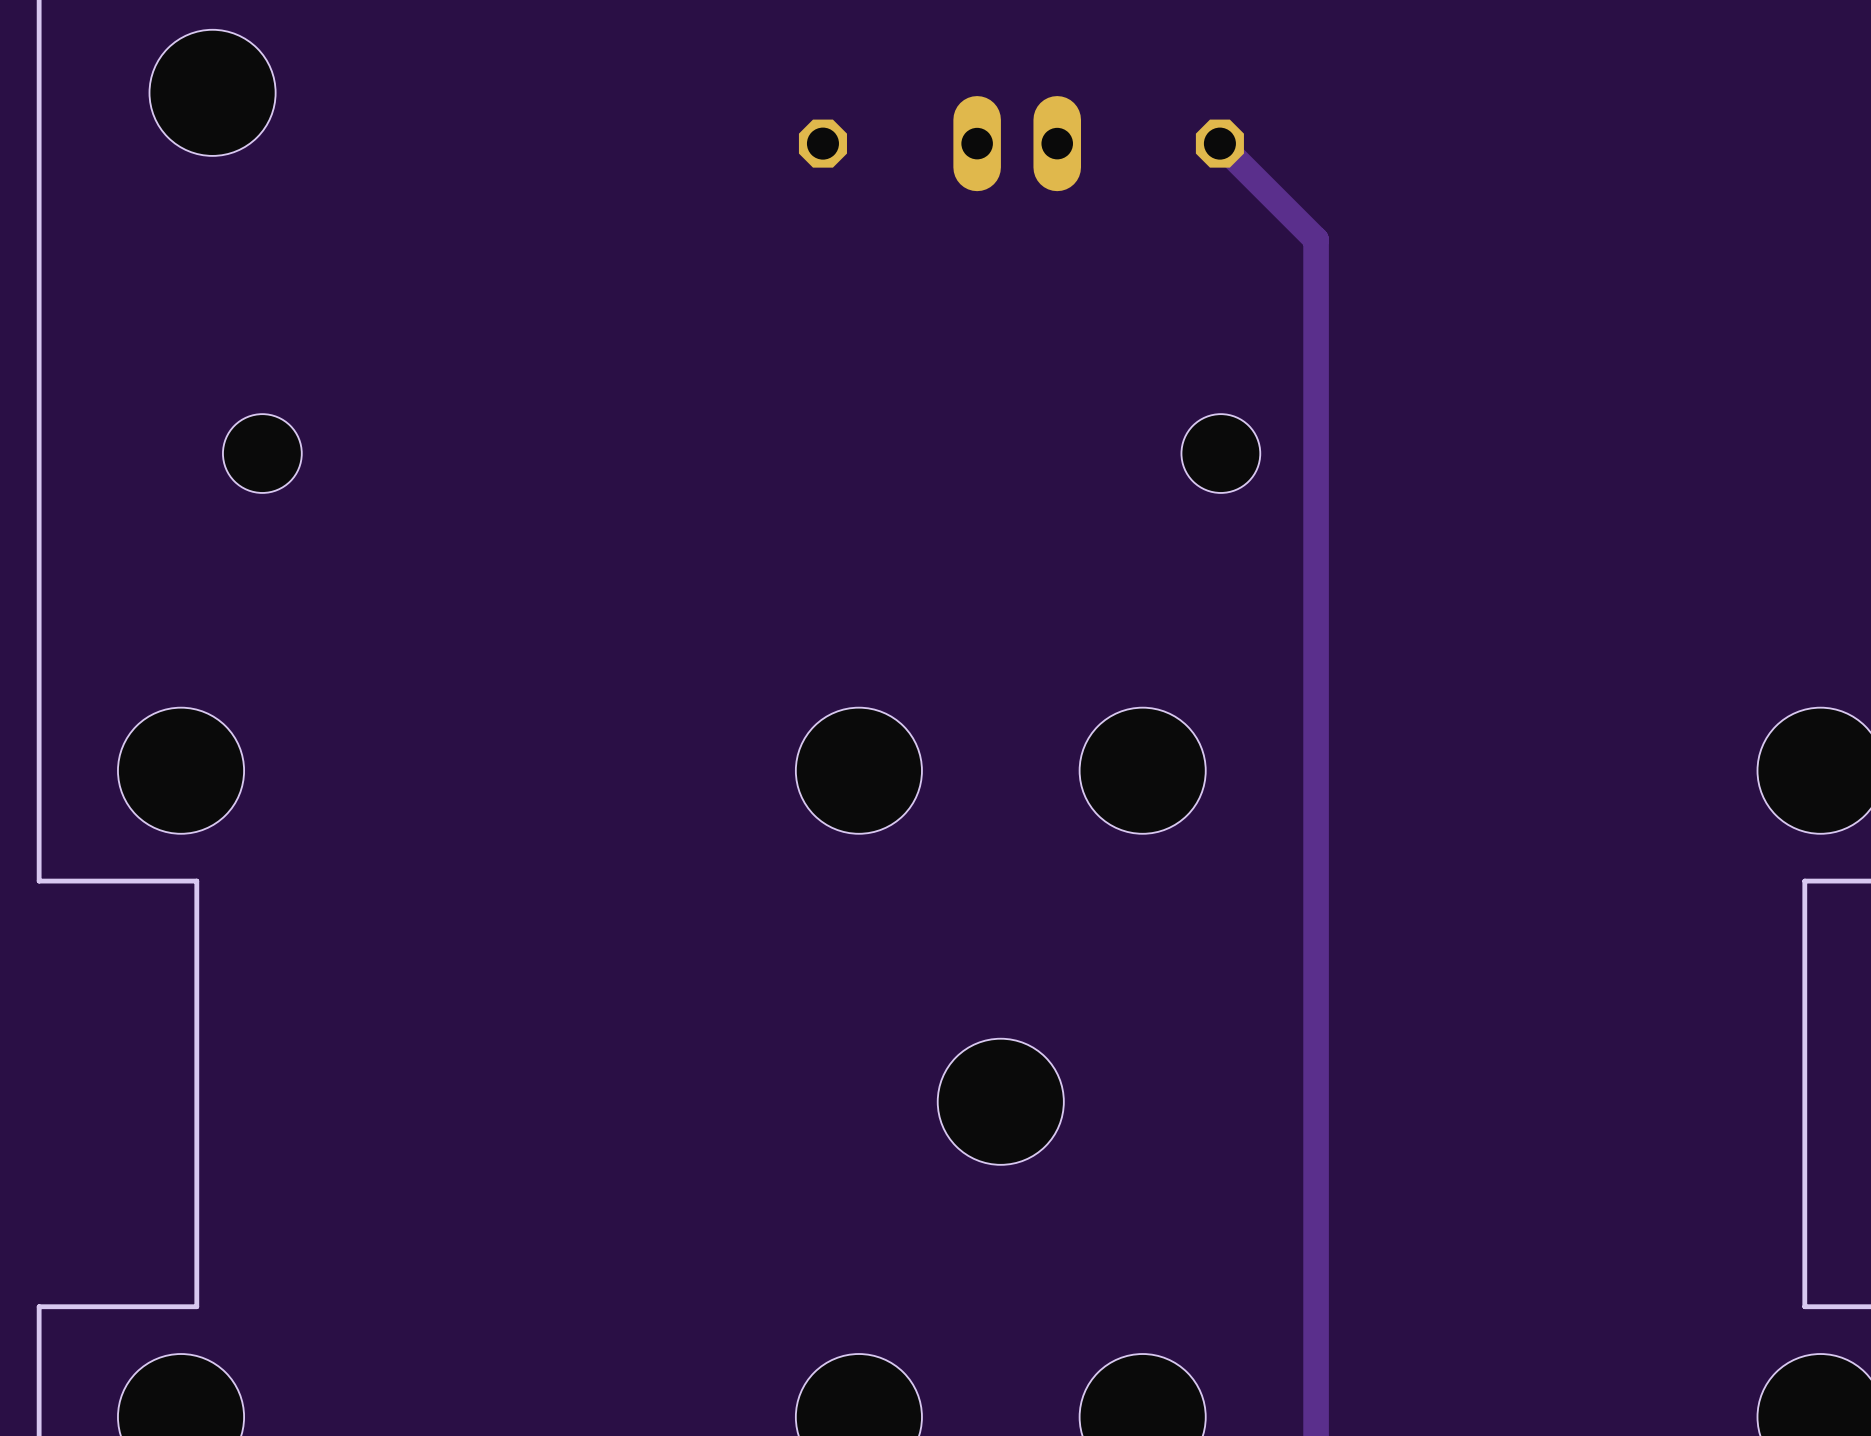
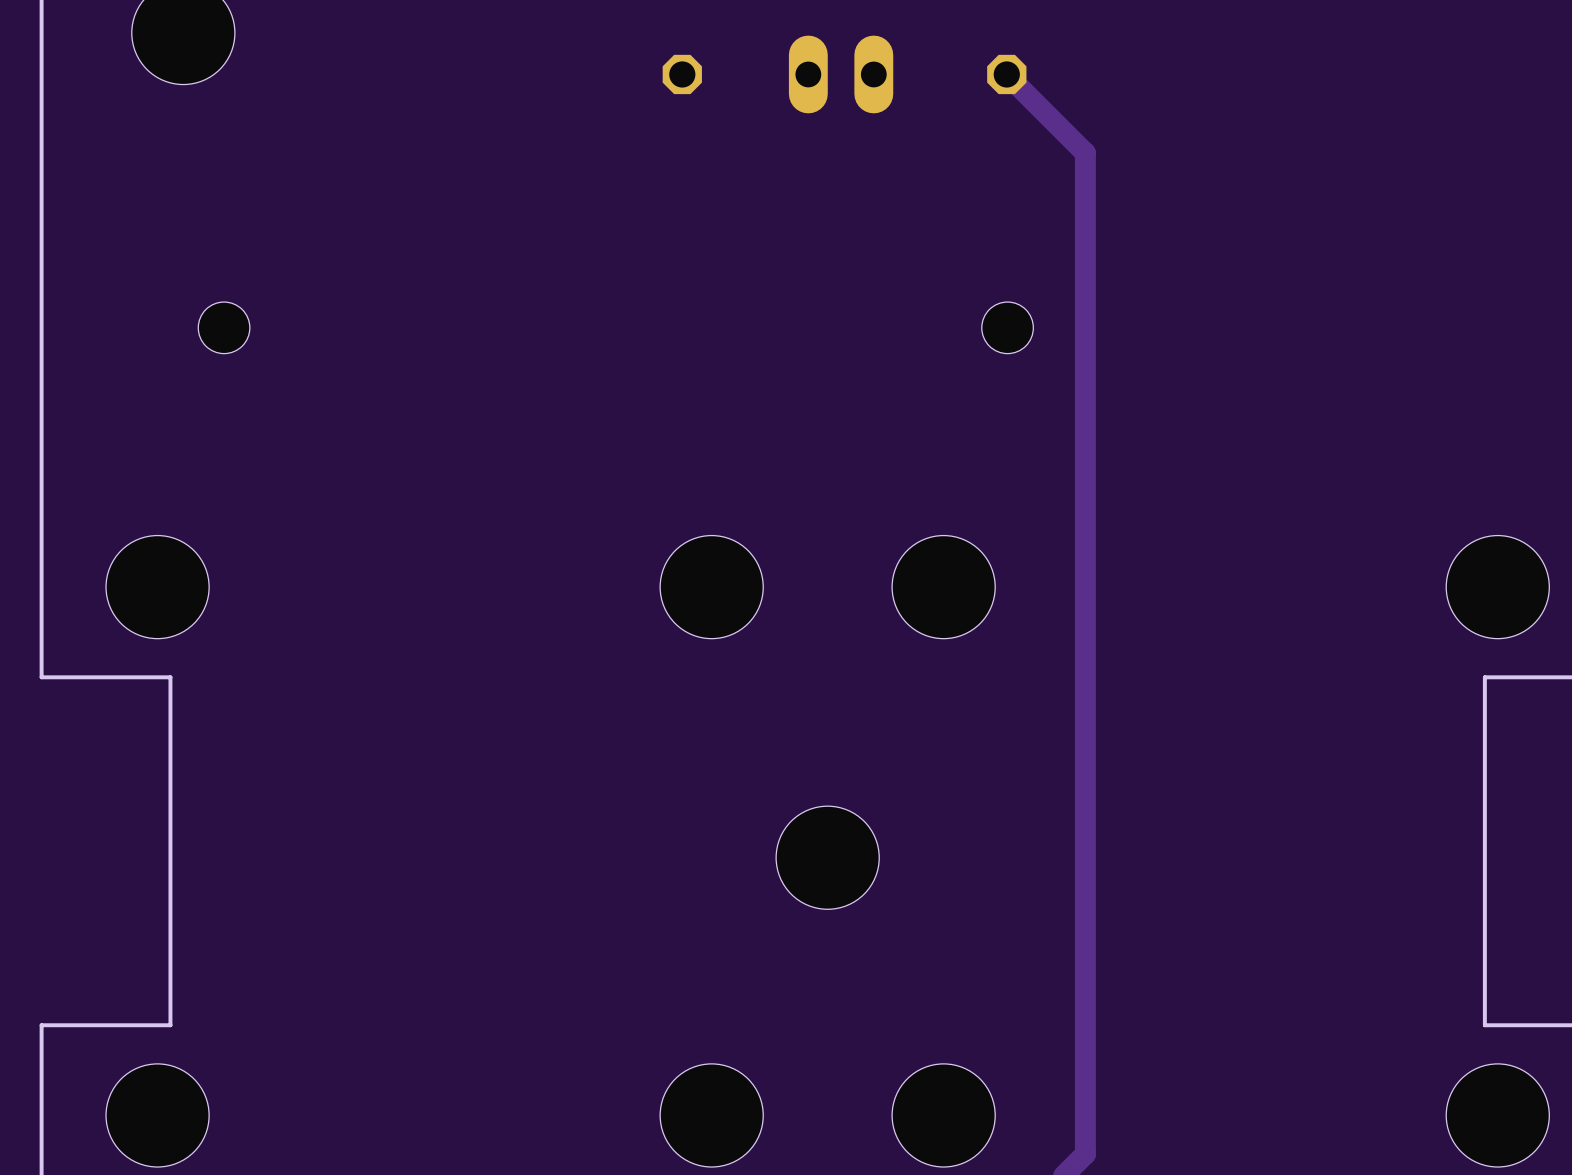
part footprint: [222, 414, 302, 493] -> [198, 302, 250, 354]
part footprint: [1181, 414, 1261, 493] -> [981, 302, 1034, 354]

